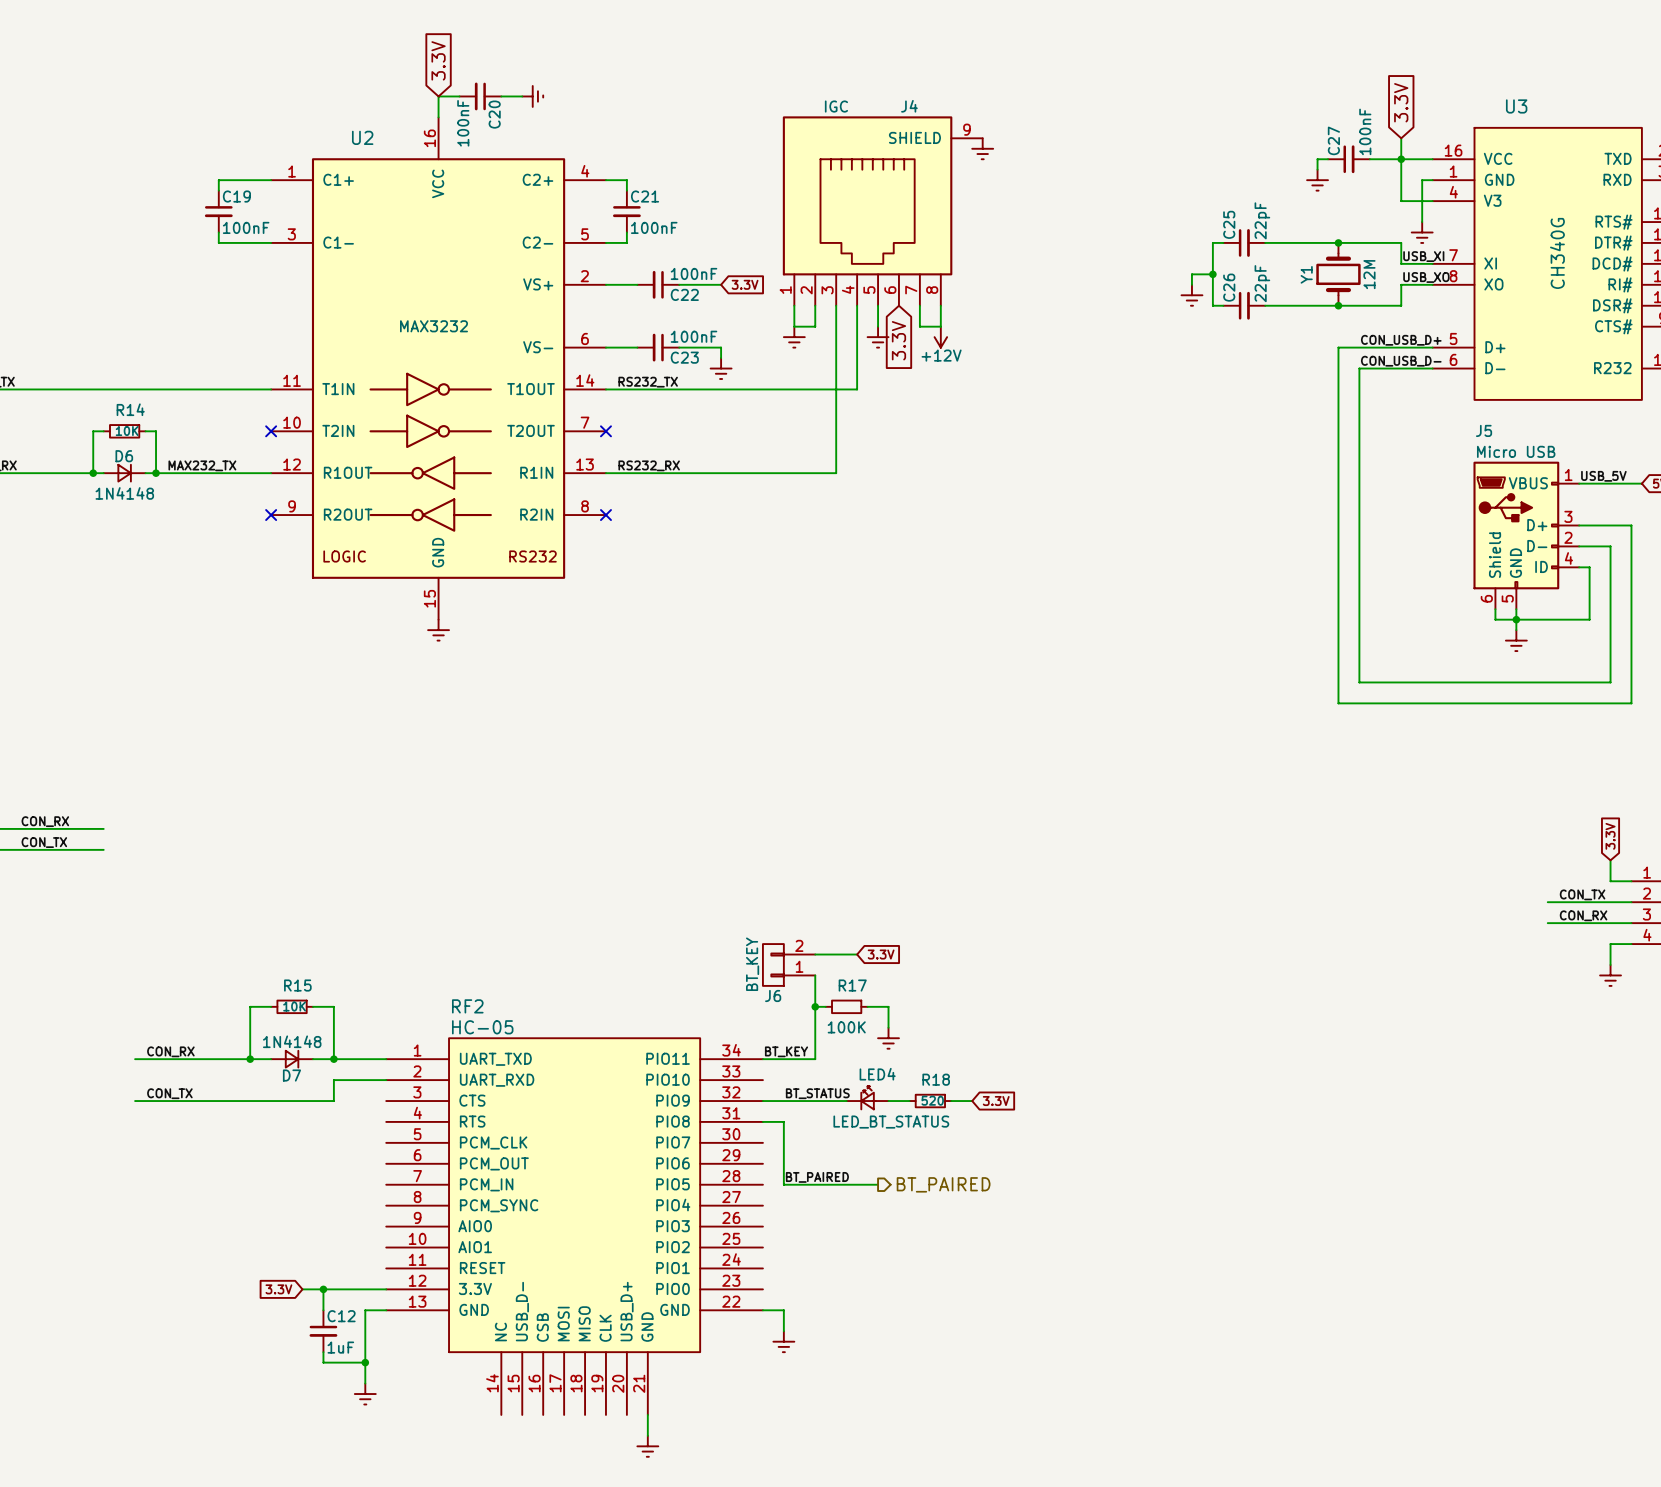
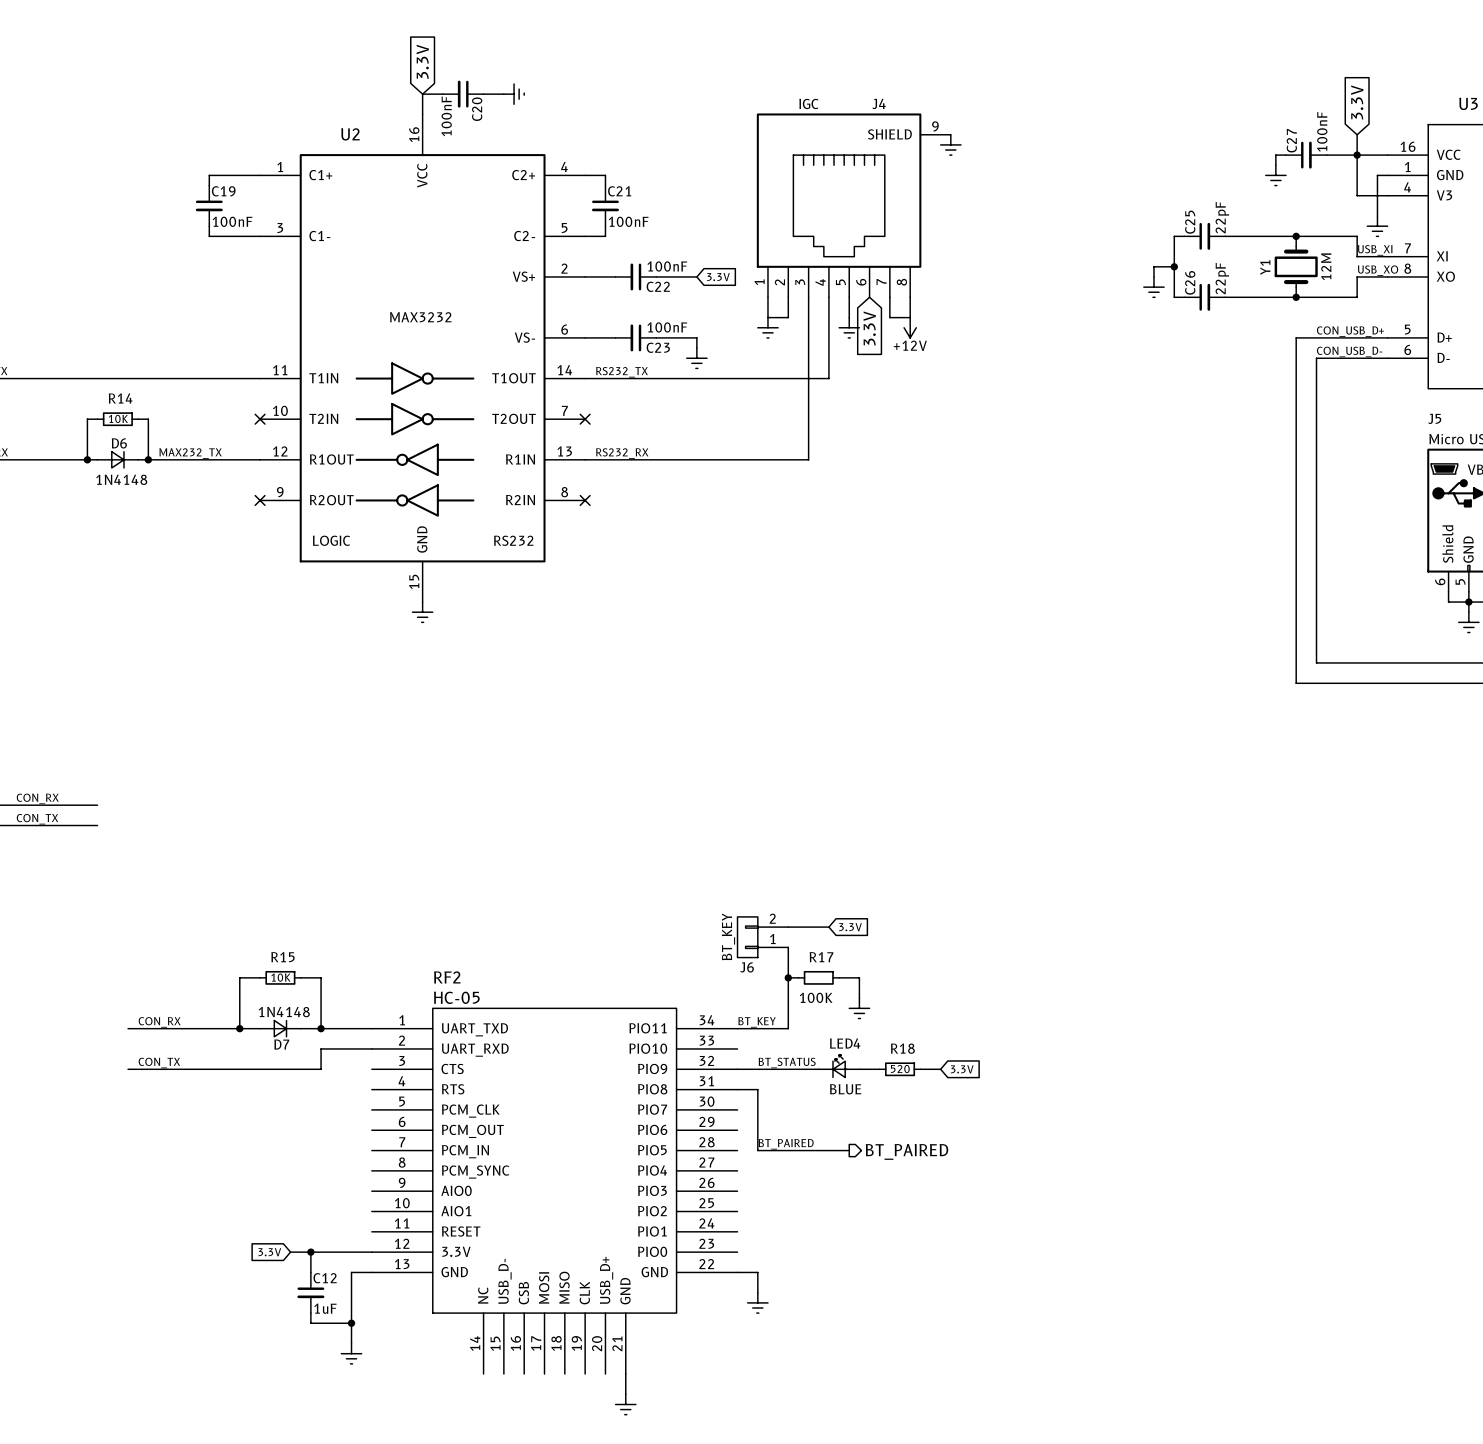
LED4 value: LED_BT_STATUS (891, 1122) -> BLUE (845, 1089)

